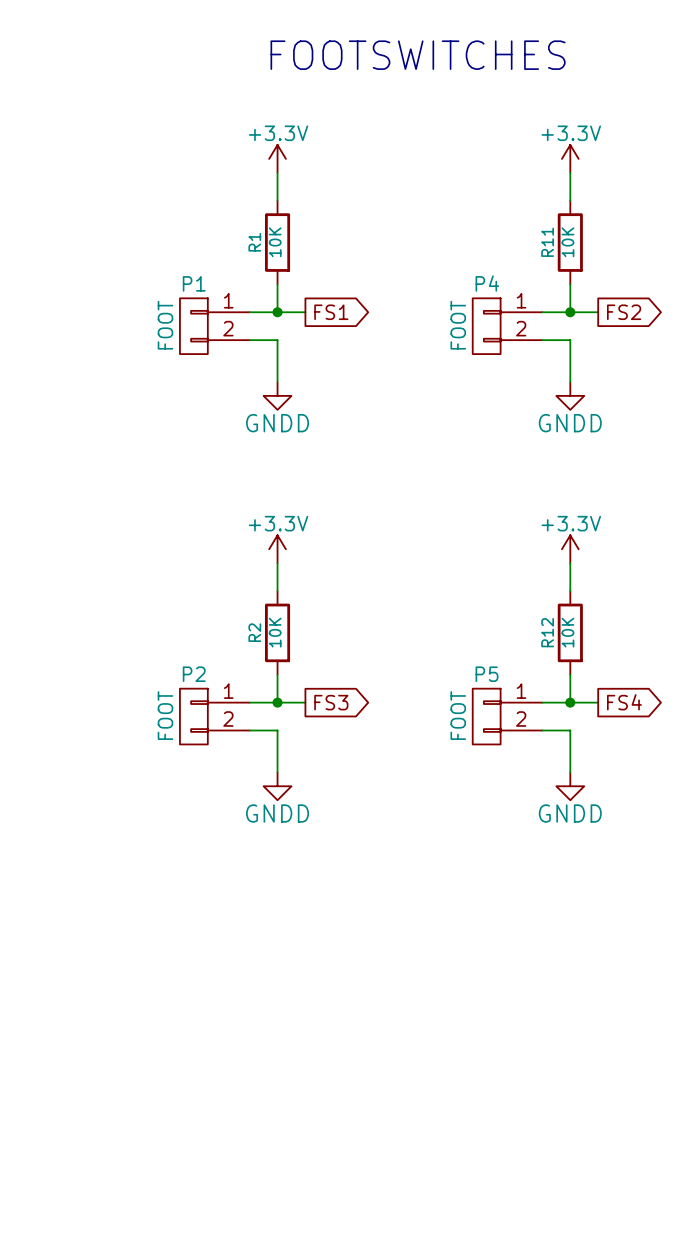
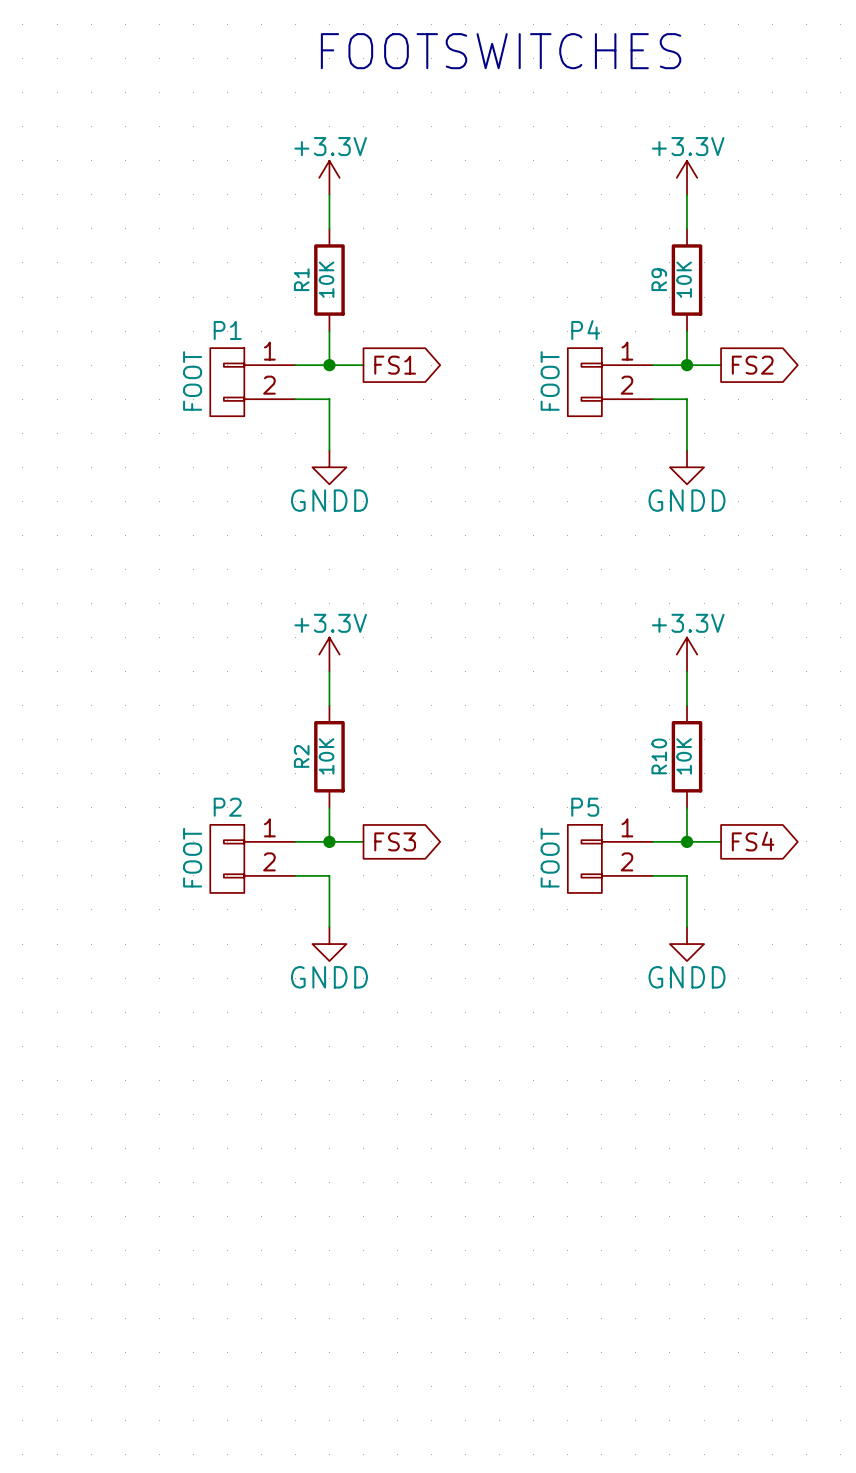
R11 name: R11 (547, 242) -> R9 (659, 279)
R12 name: R12 (547, 632) -> R10 (659, 756)

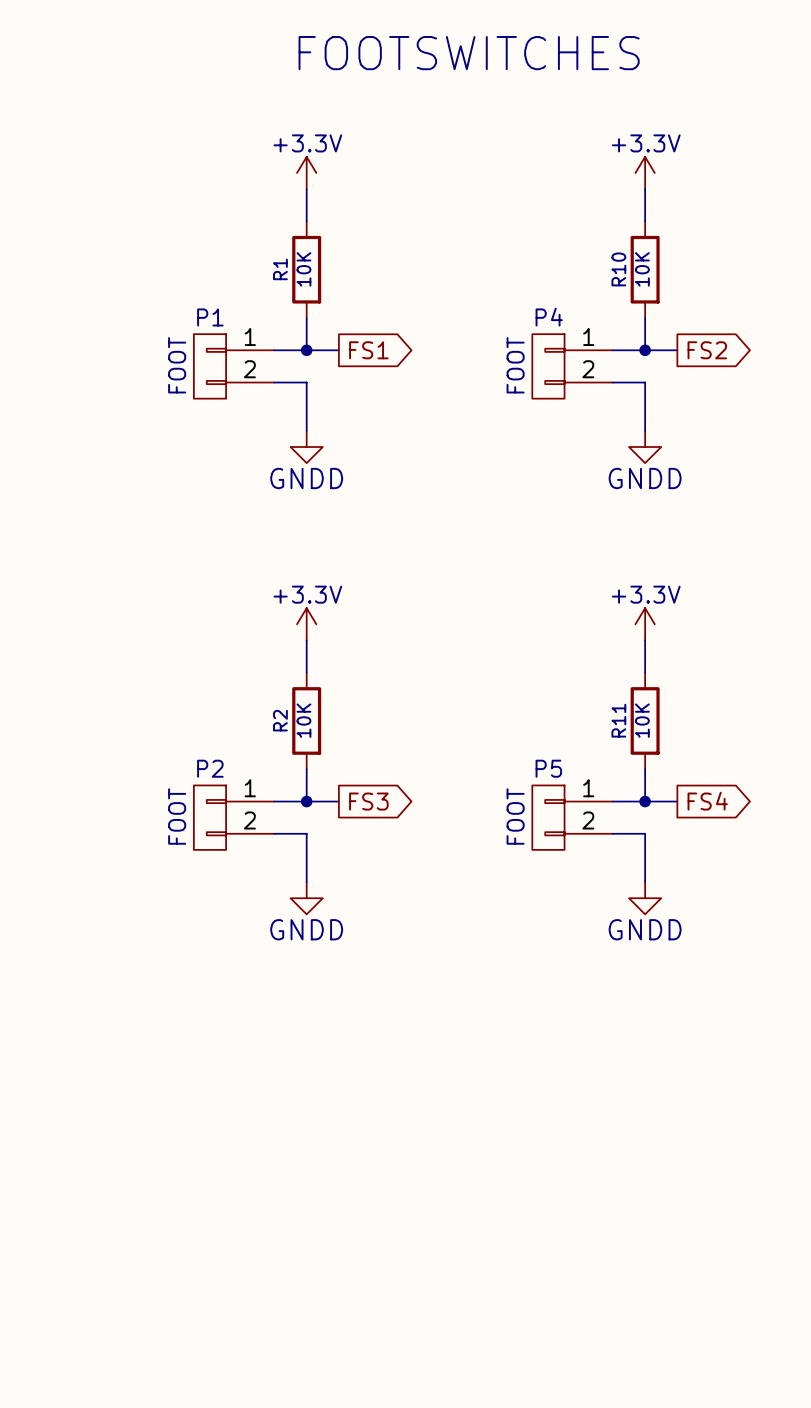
R9 name: R9 (659, 279) -> R10 (618, 269)
R10 name: R10 (659, 756) -> R11 (618, 720)

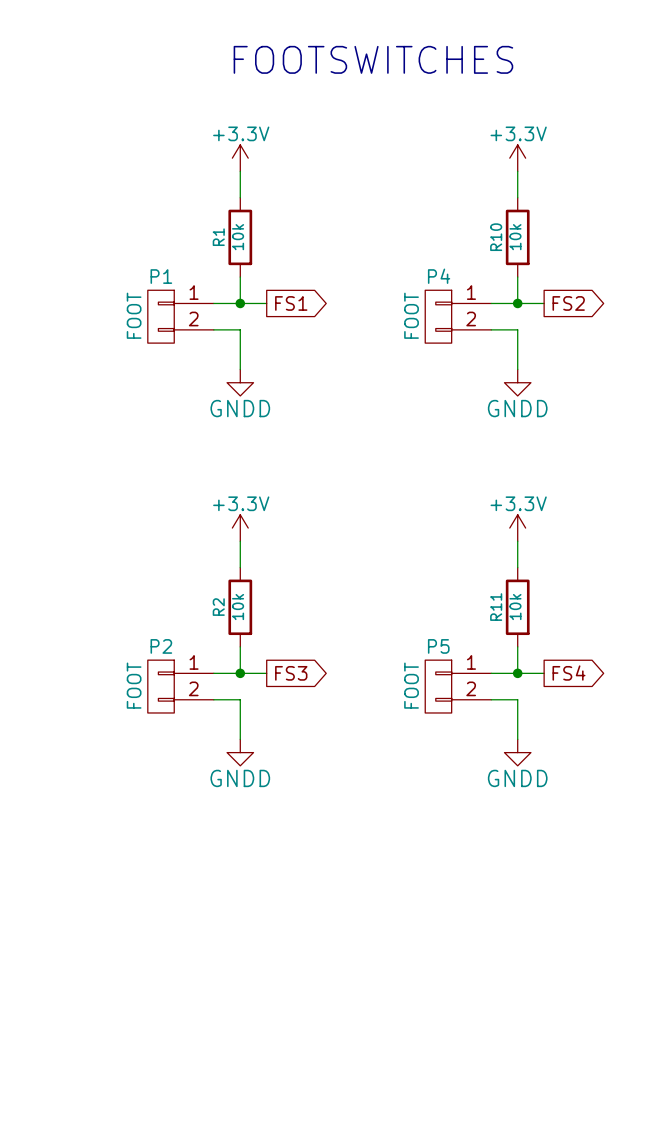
R1 value: 10K (303, 269) -> 10k (238, 237)
R10 value: 10K (642, 269) -> 10k (515, 237)
R2 value: 10K (303, 720) -> 10k (238, 607)
R11 value: 10K (642, 720) -> 10k (515, 607)

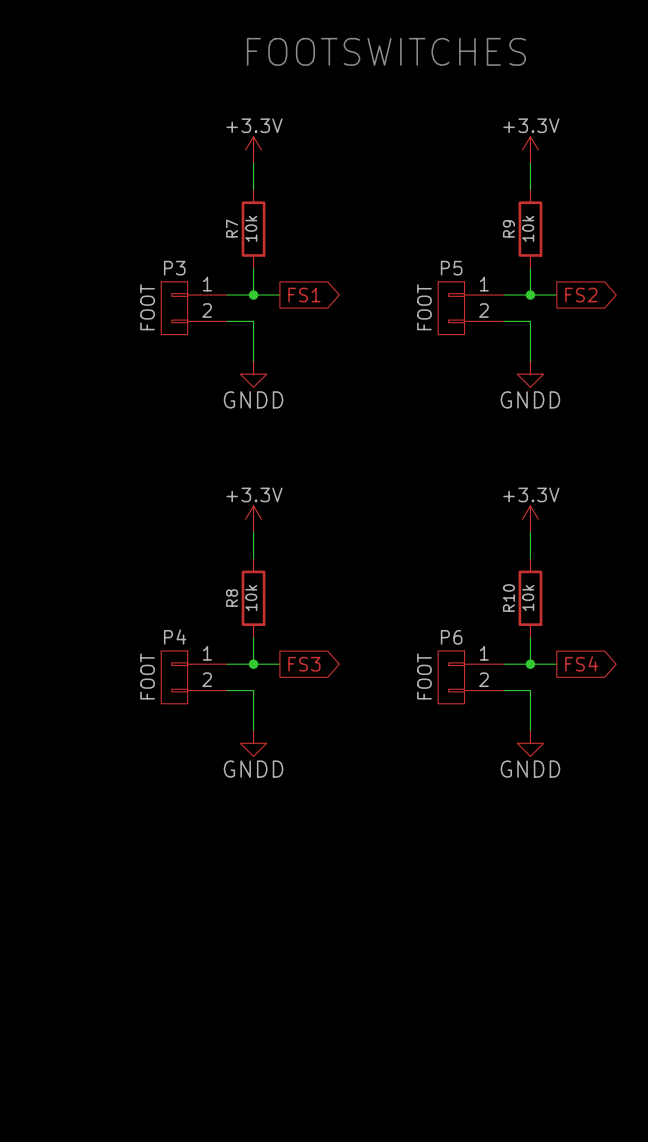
R1 name: R1 (218, 237) -> R7 (232, 228)
R10 name: R10 (496, 237) -> R9 (508, 228)
P1 name: P1 (161, 276) -> P3 (174, 268)
P4 name: P4 (439, 276) -> P5 (451, 268)
R2 name: R2 (218, 607) -> R8 (232, 598)
R11 name: R11 (496, 607) -> R10 (508, 598)
P2 name: P2 (161, 646) -> P4 (175, 637)
P5 name: P5 (438, 646) -> P6 (451, 637)

